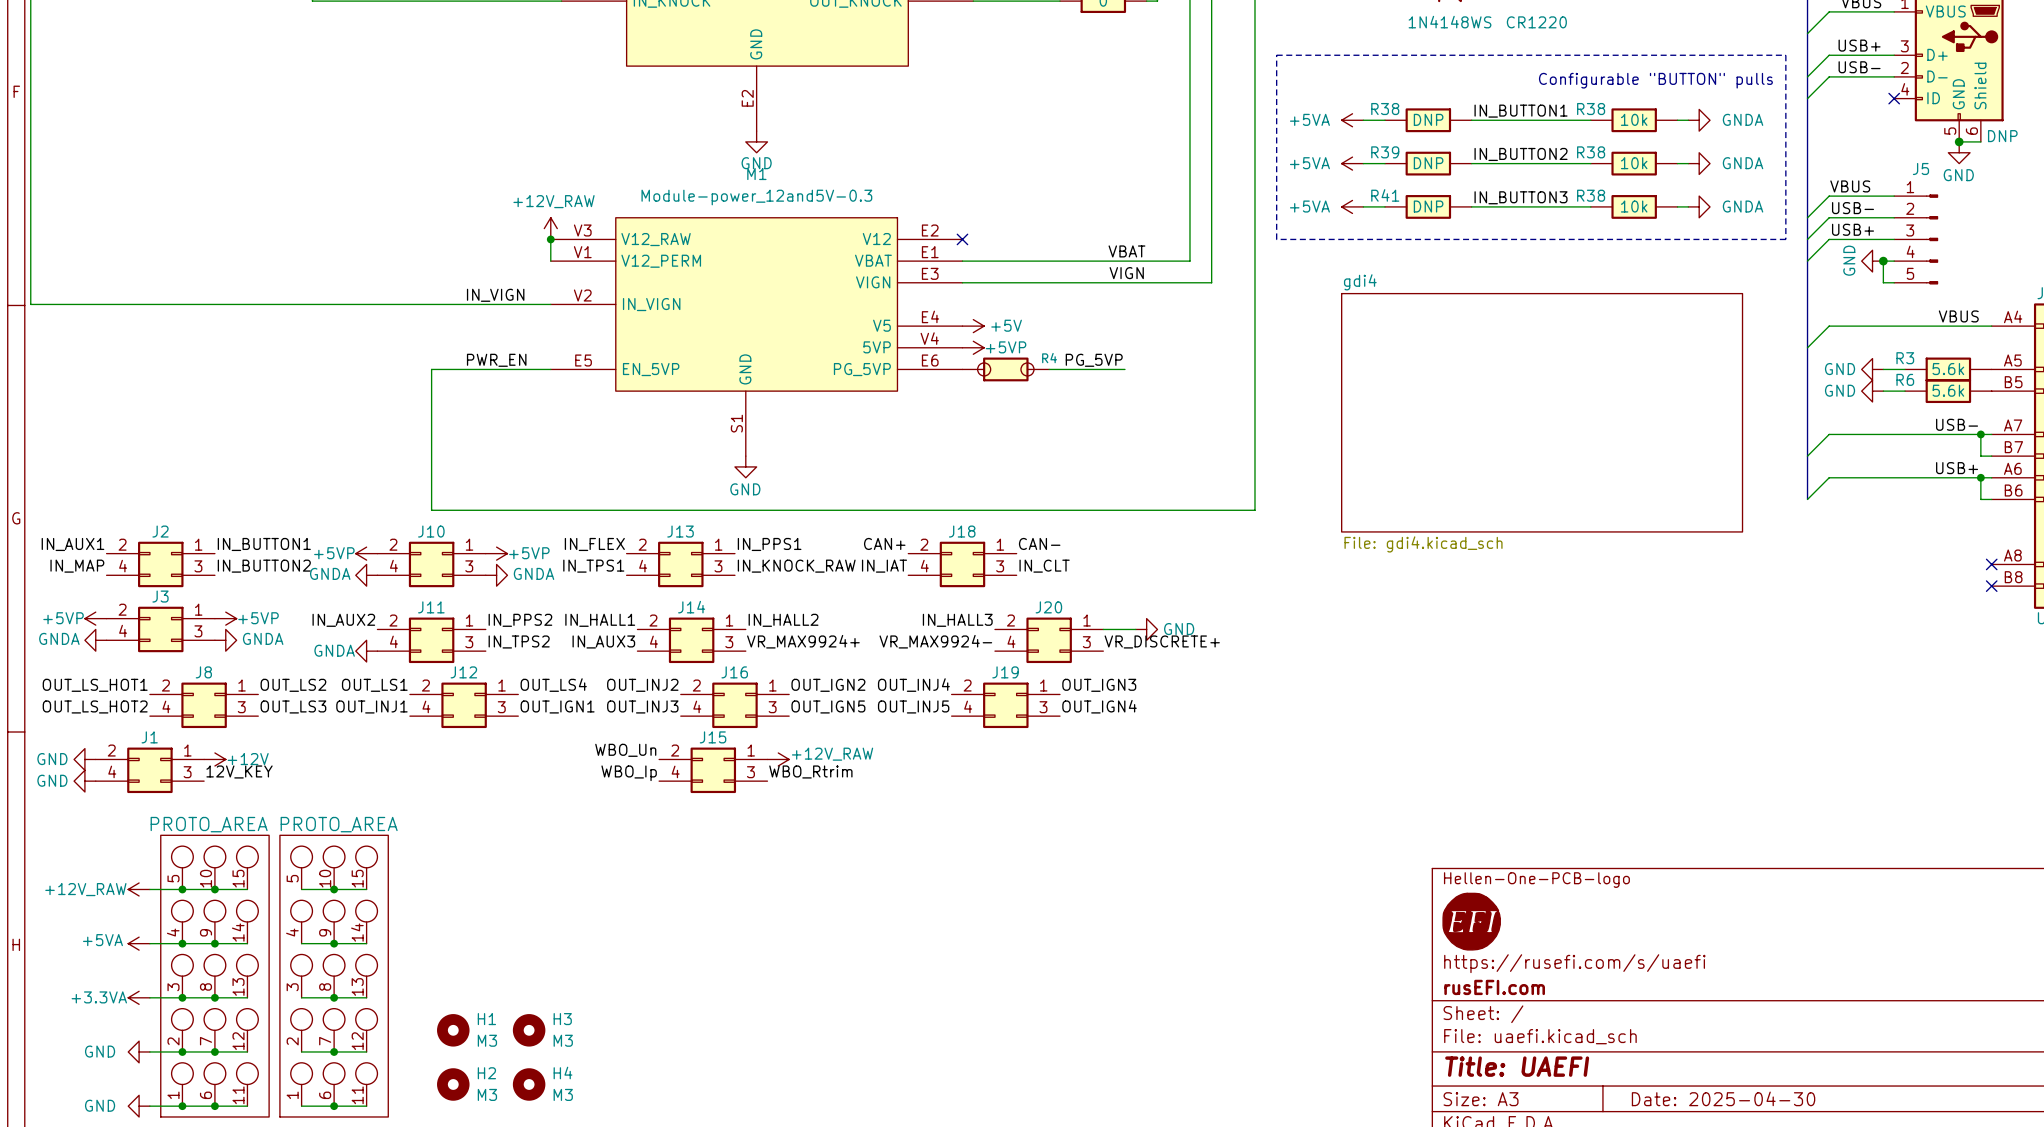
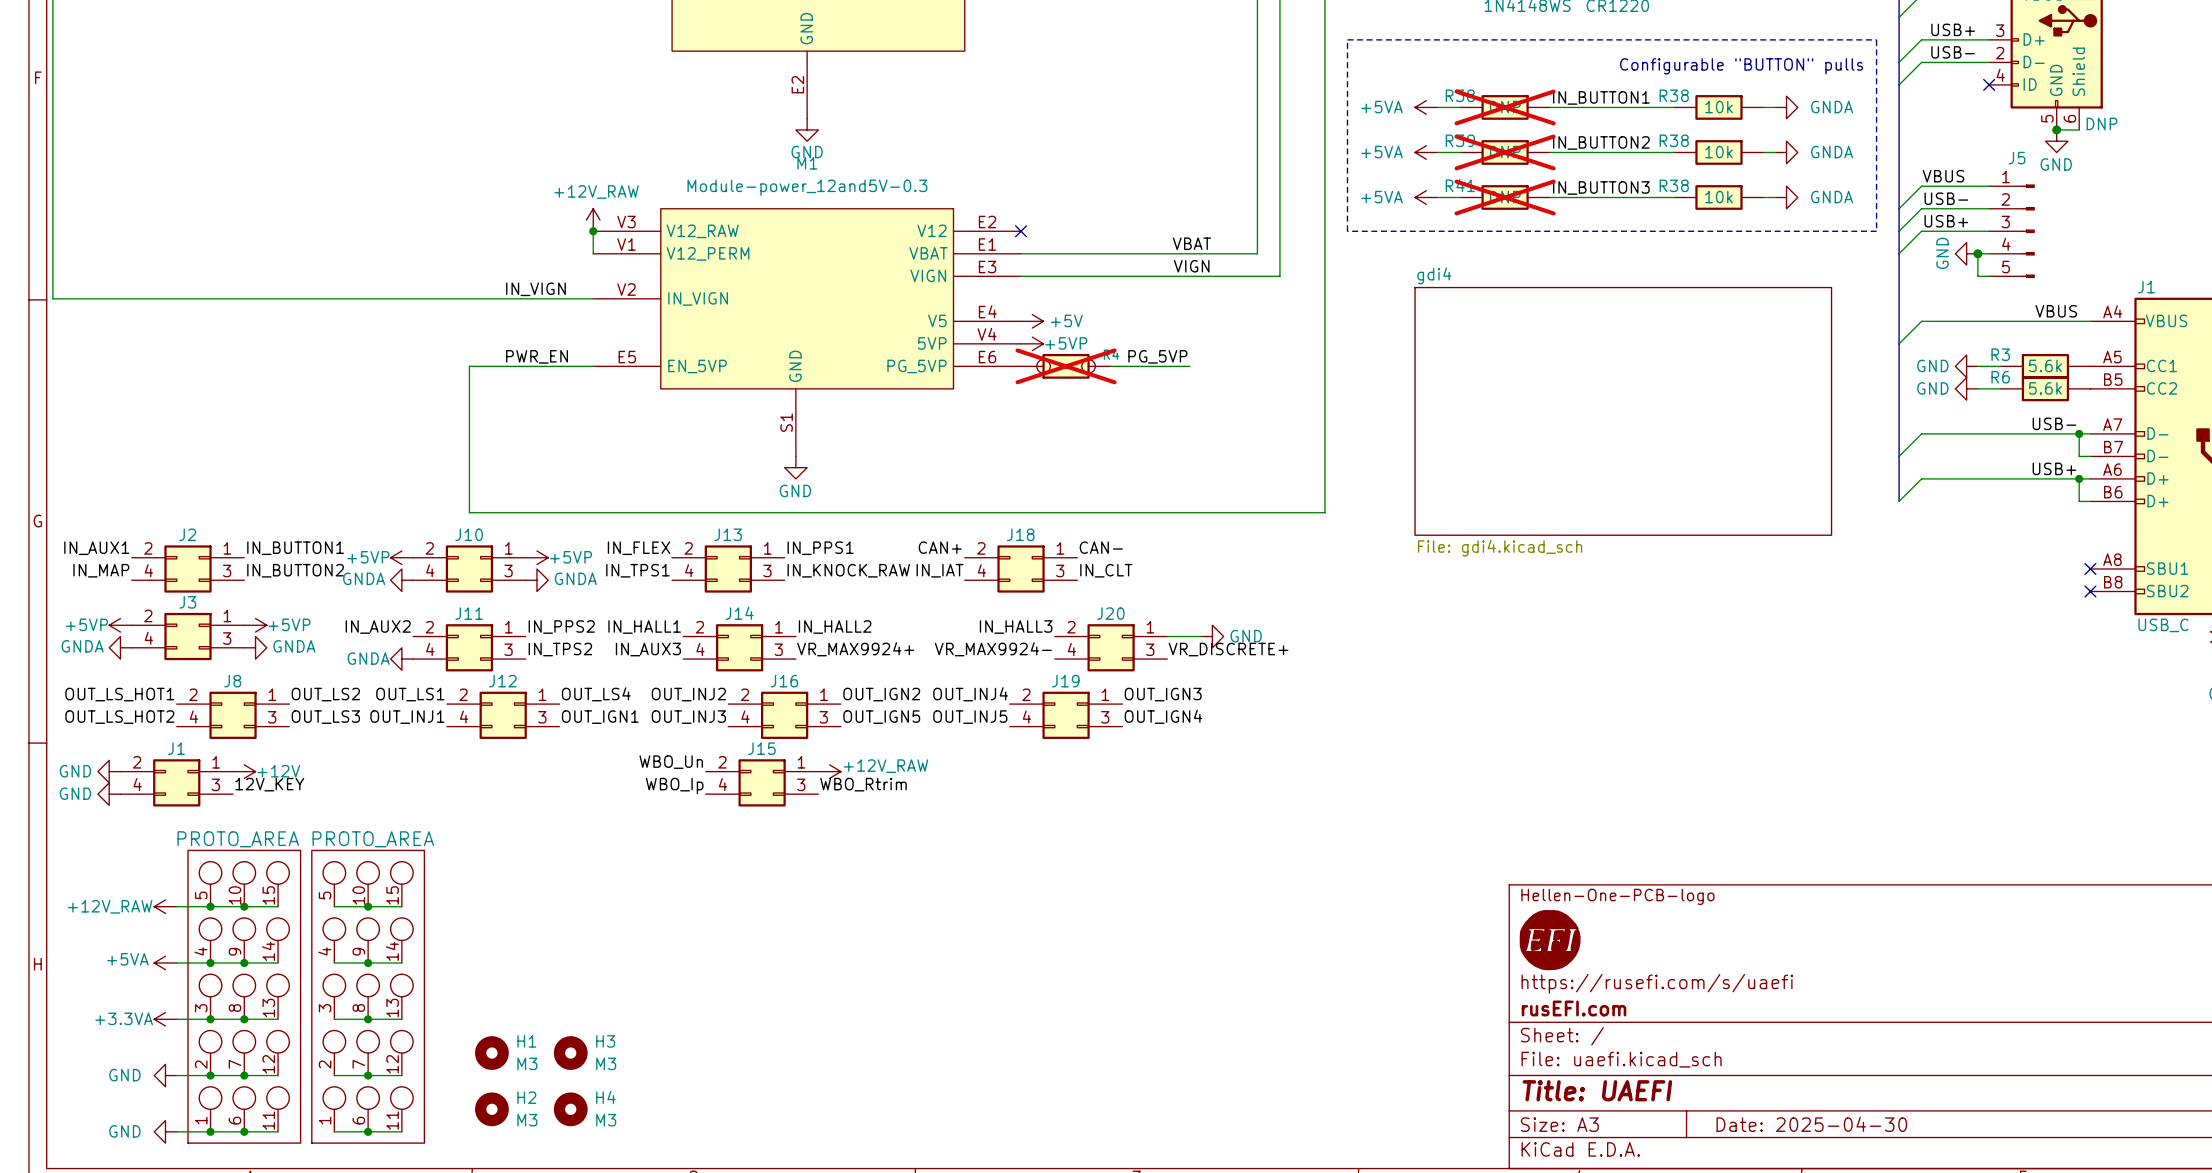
R38 do-not-place cross: none -> (1505, 107)
R39 do-not-place cross: none -> (1505, 152)
R41 do-not-place cross: none -> (1505, 197)
R4 do-not-place cross: none -> (1066, 366)

